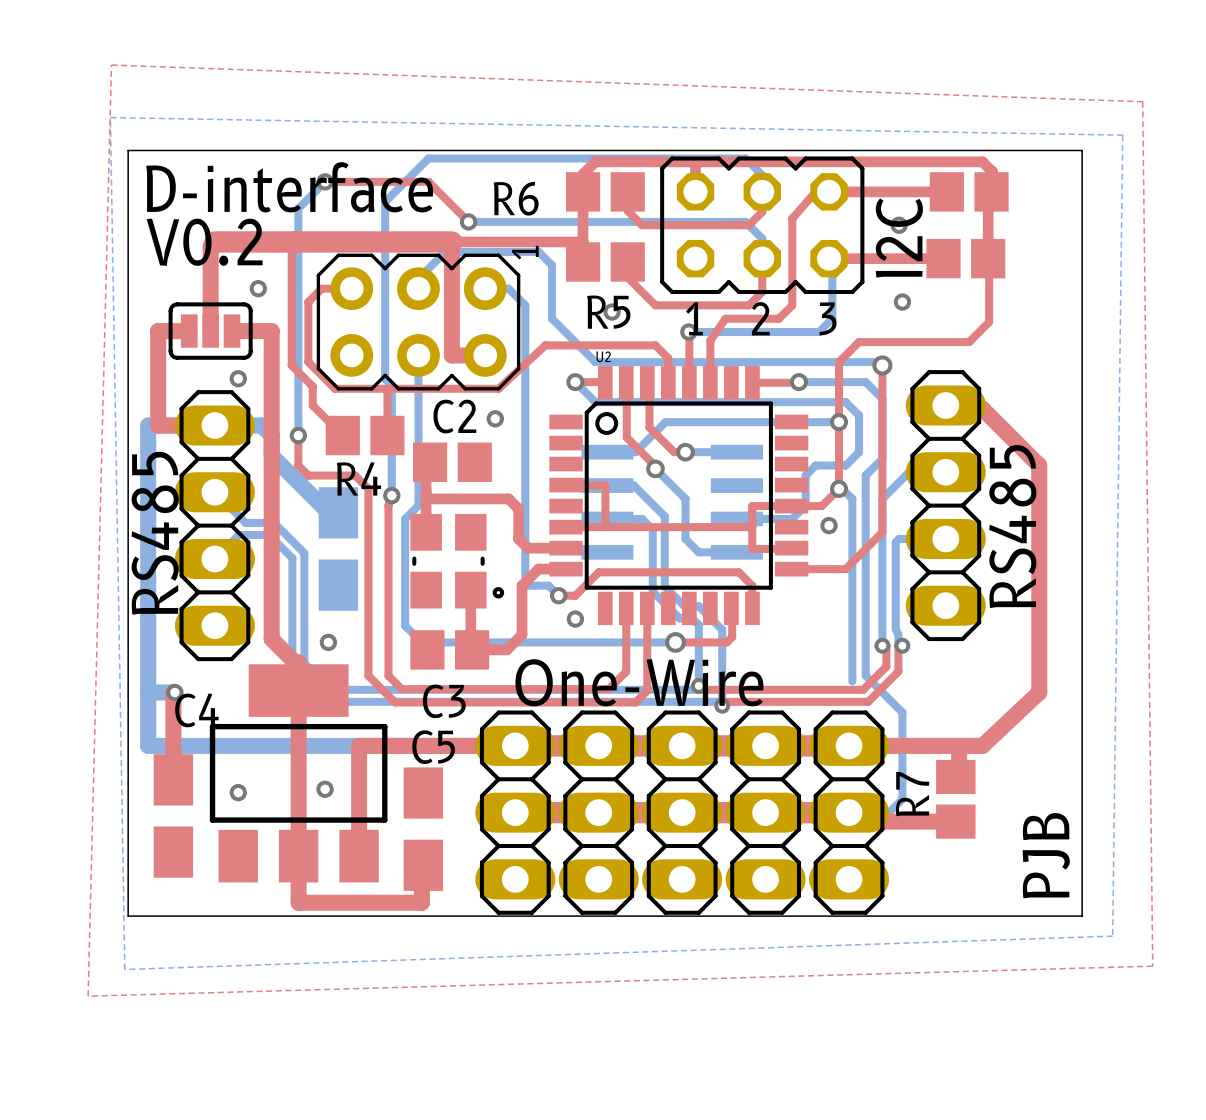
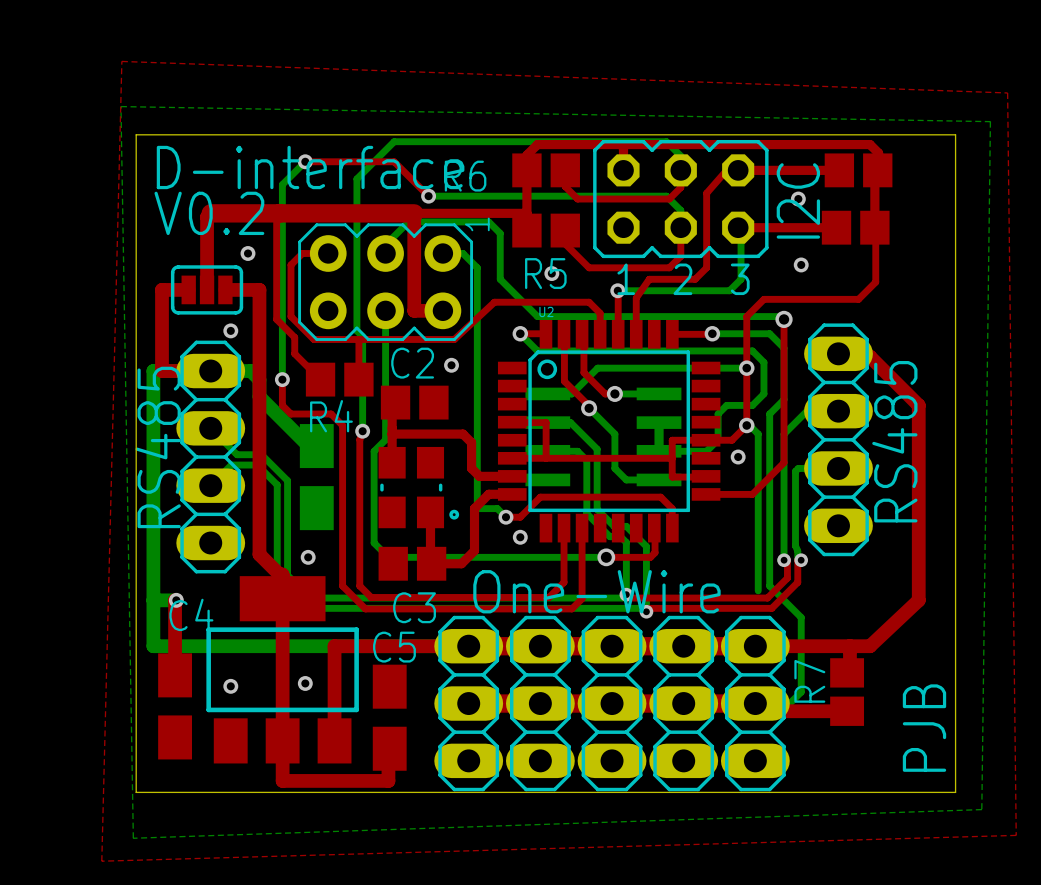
bottom track: none -> (659, 422) (659, 451)

